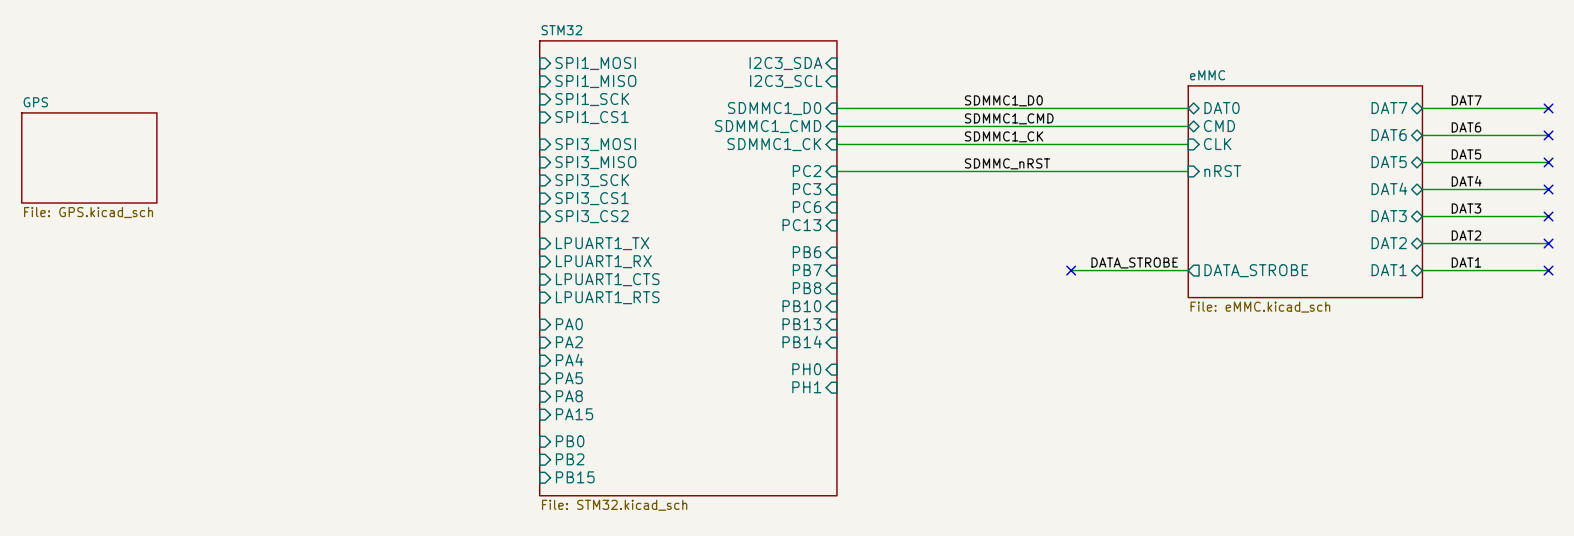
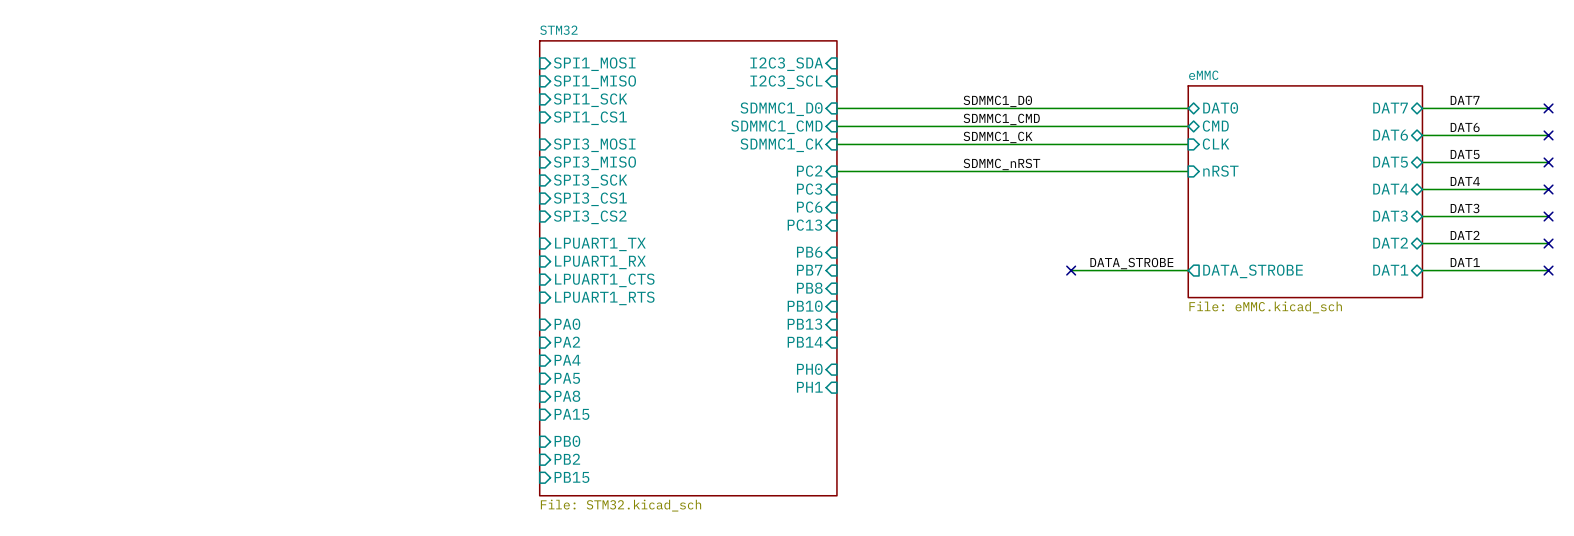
sheet GPS: File: GPS.kicad_sch (89, 157) -> none

